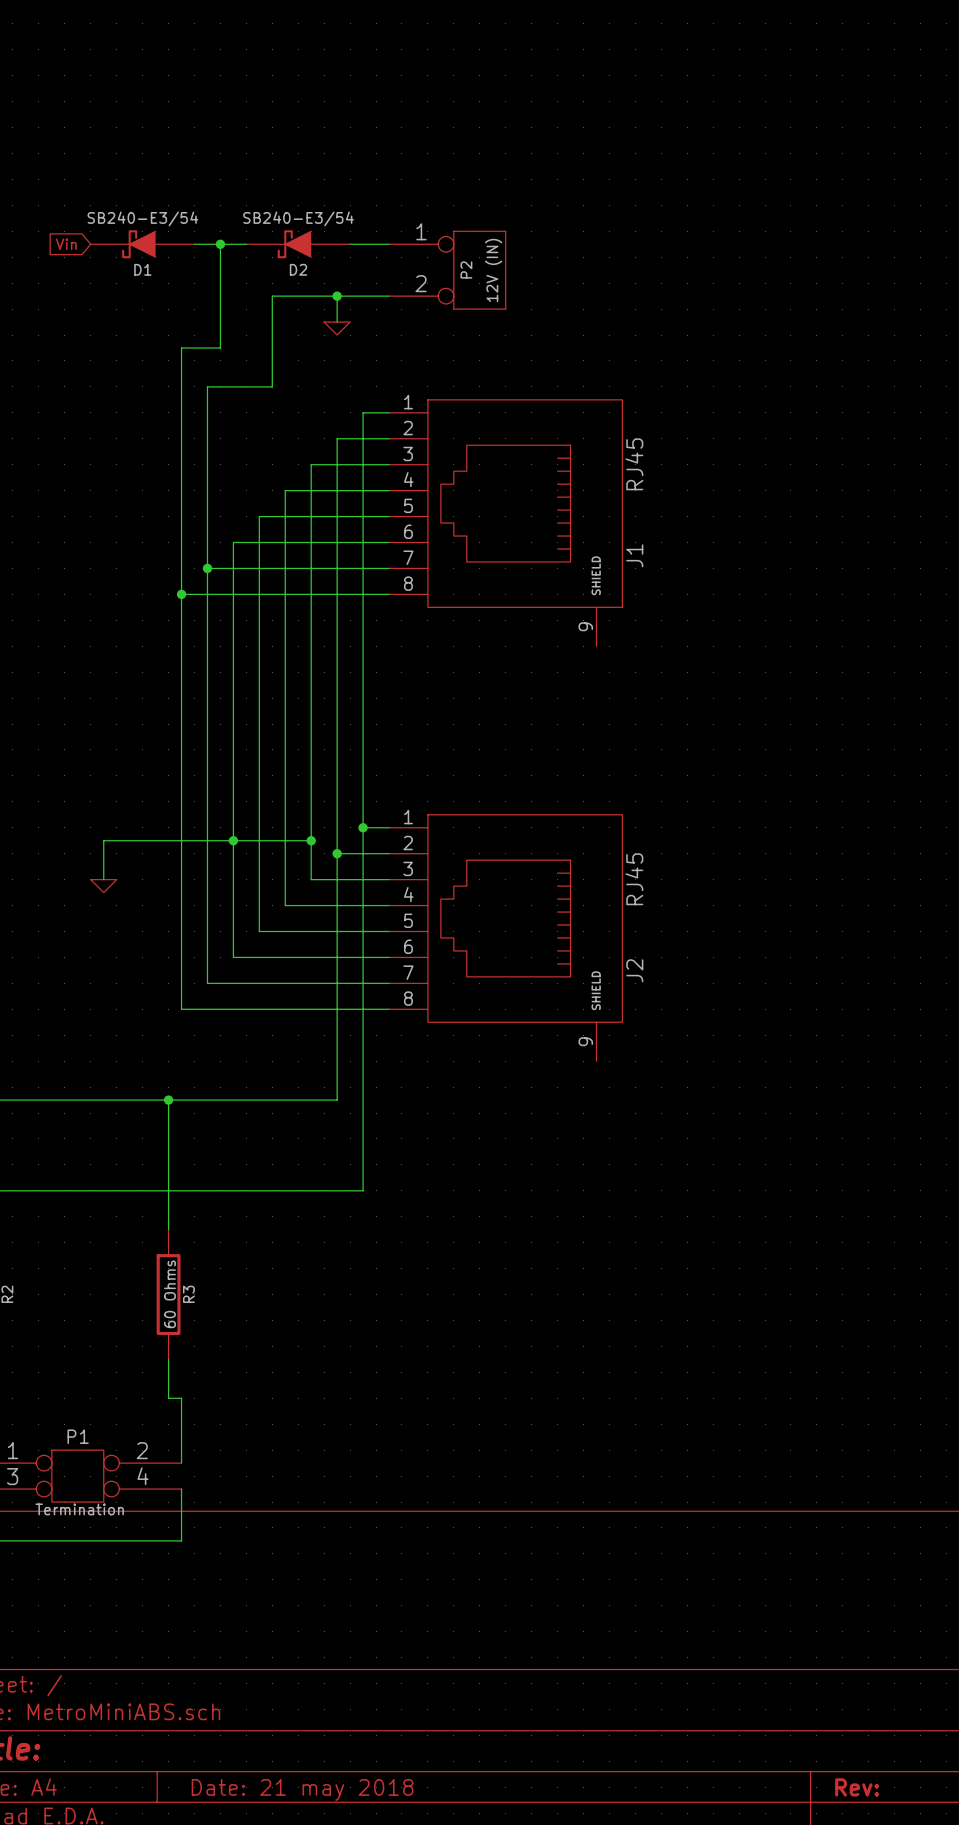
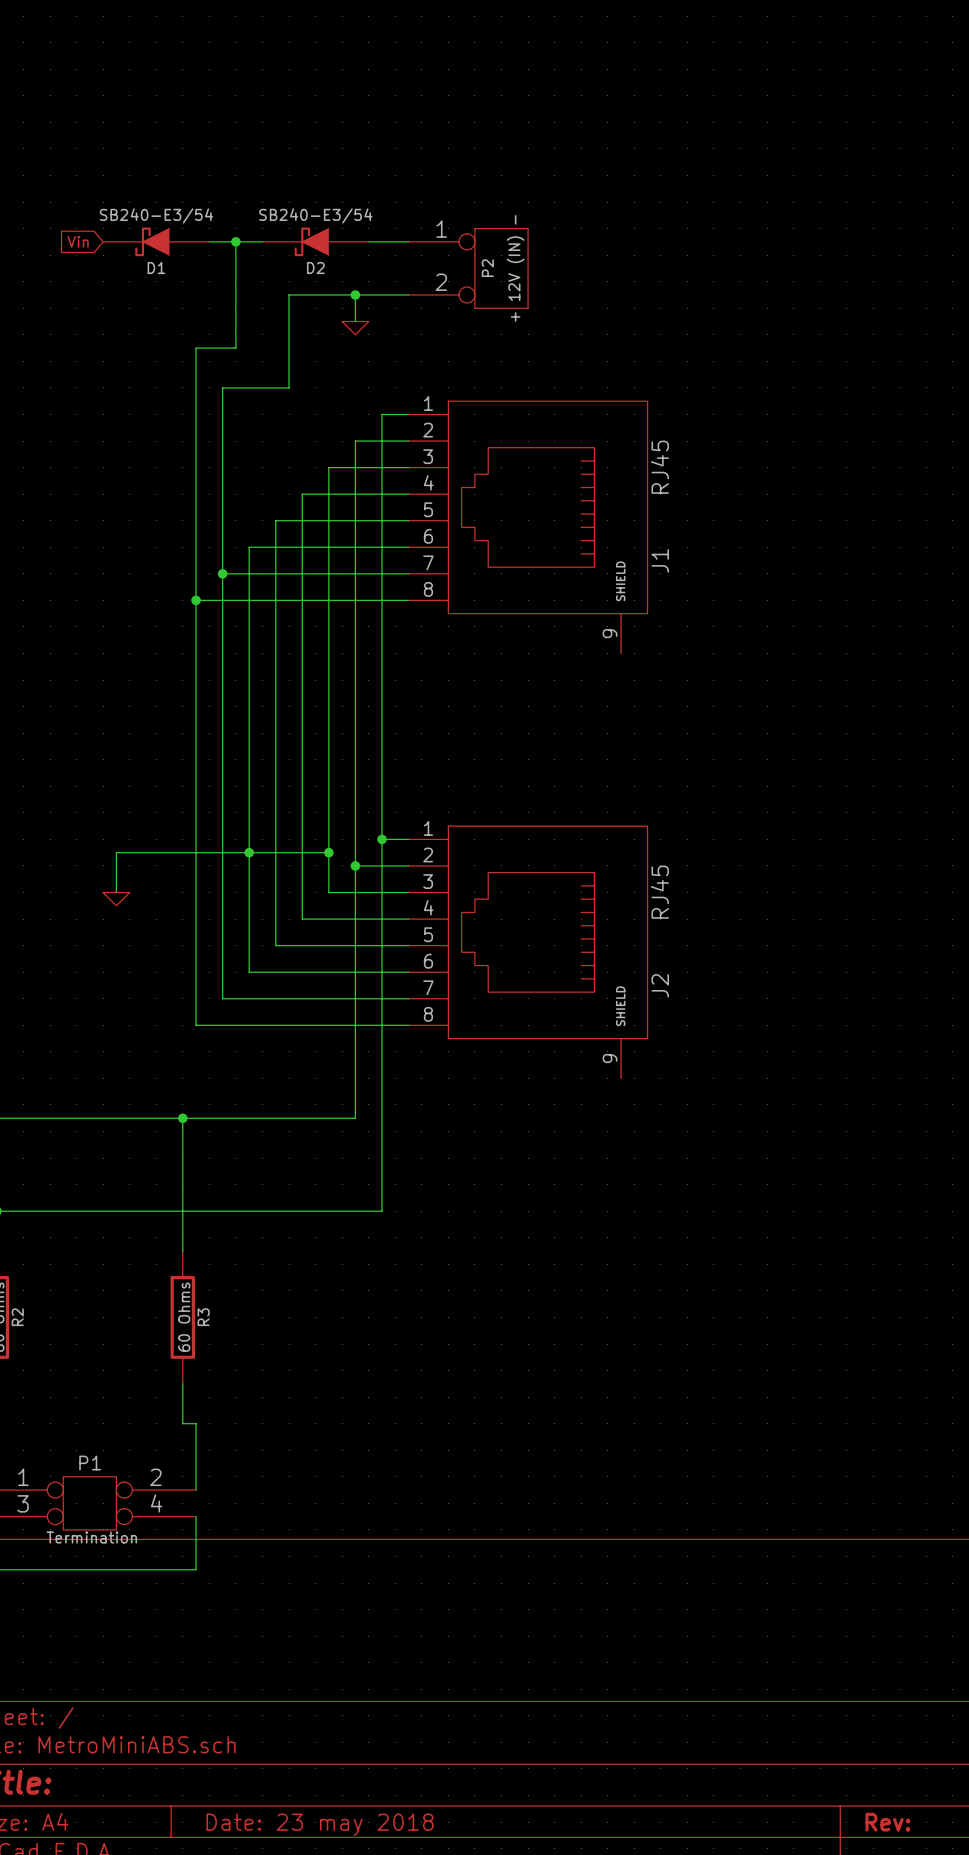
P2 value: 12V (IN) (493, 270) -> + 12V (IN) - (515, 268)
title block: Date: 21 may 2018 (302, 1789) -> Date: 23 may 2018 (320, 1824)

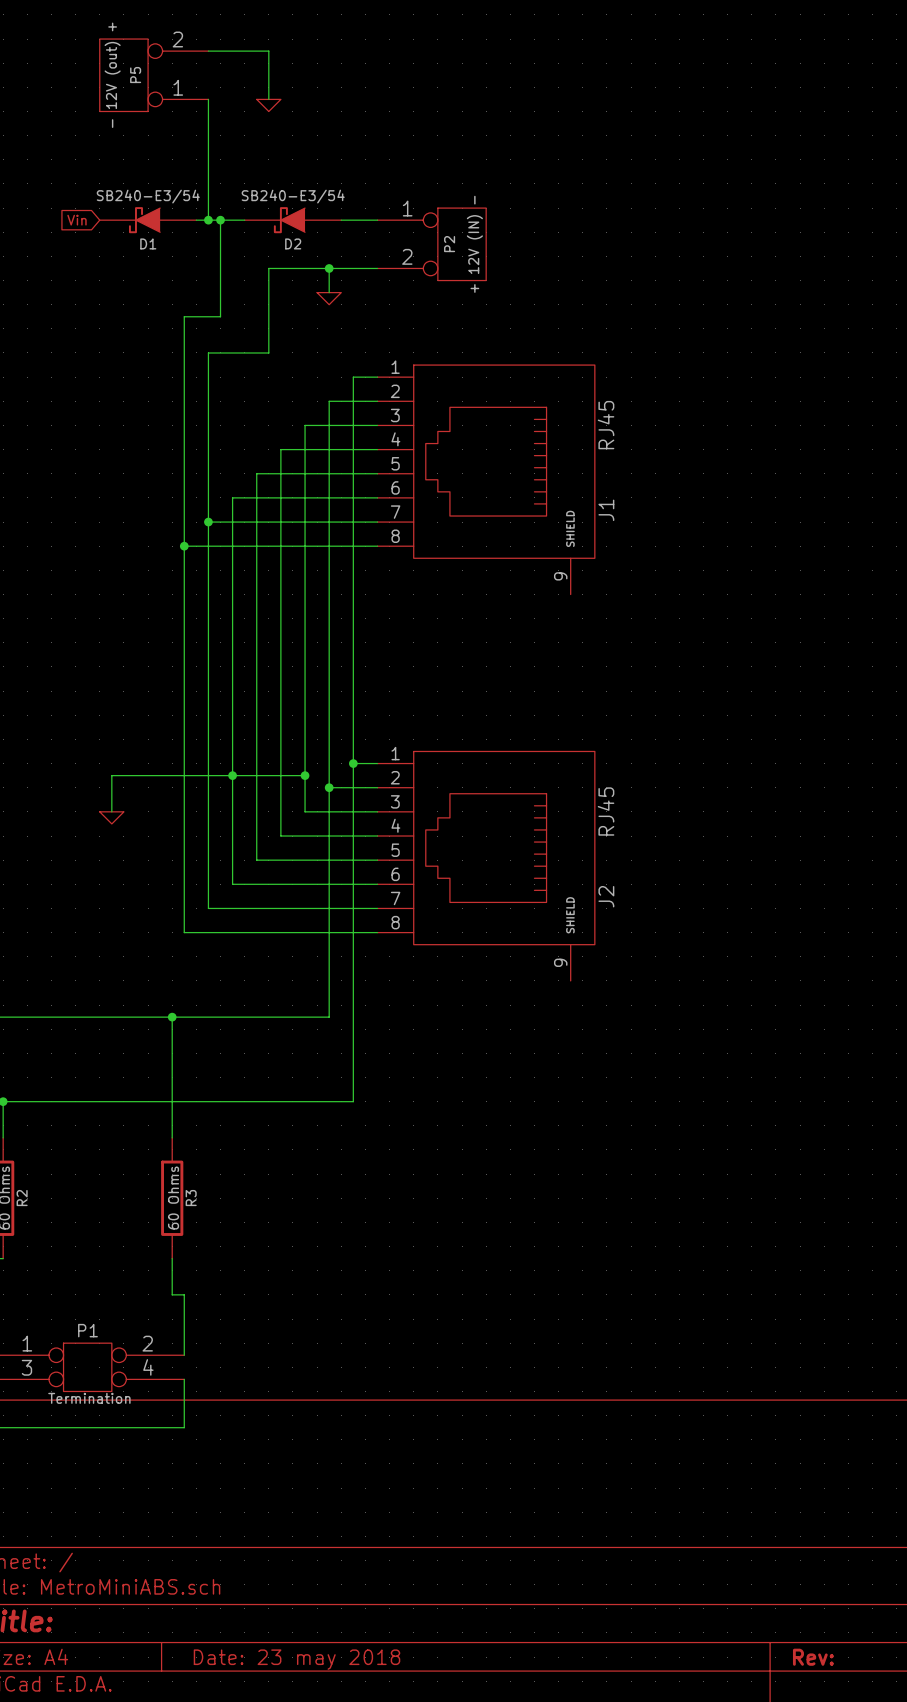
wire: none -> (208, 51) (268, 51) (268, 99)
P5: none -> - 12V (out) + (154, 75)
wire: none -> (208, 99) (208, 220)
power symbol: none -> (268, 105)
junction: none -> (208, 220)

